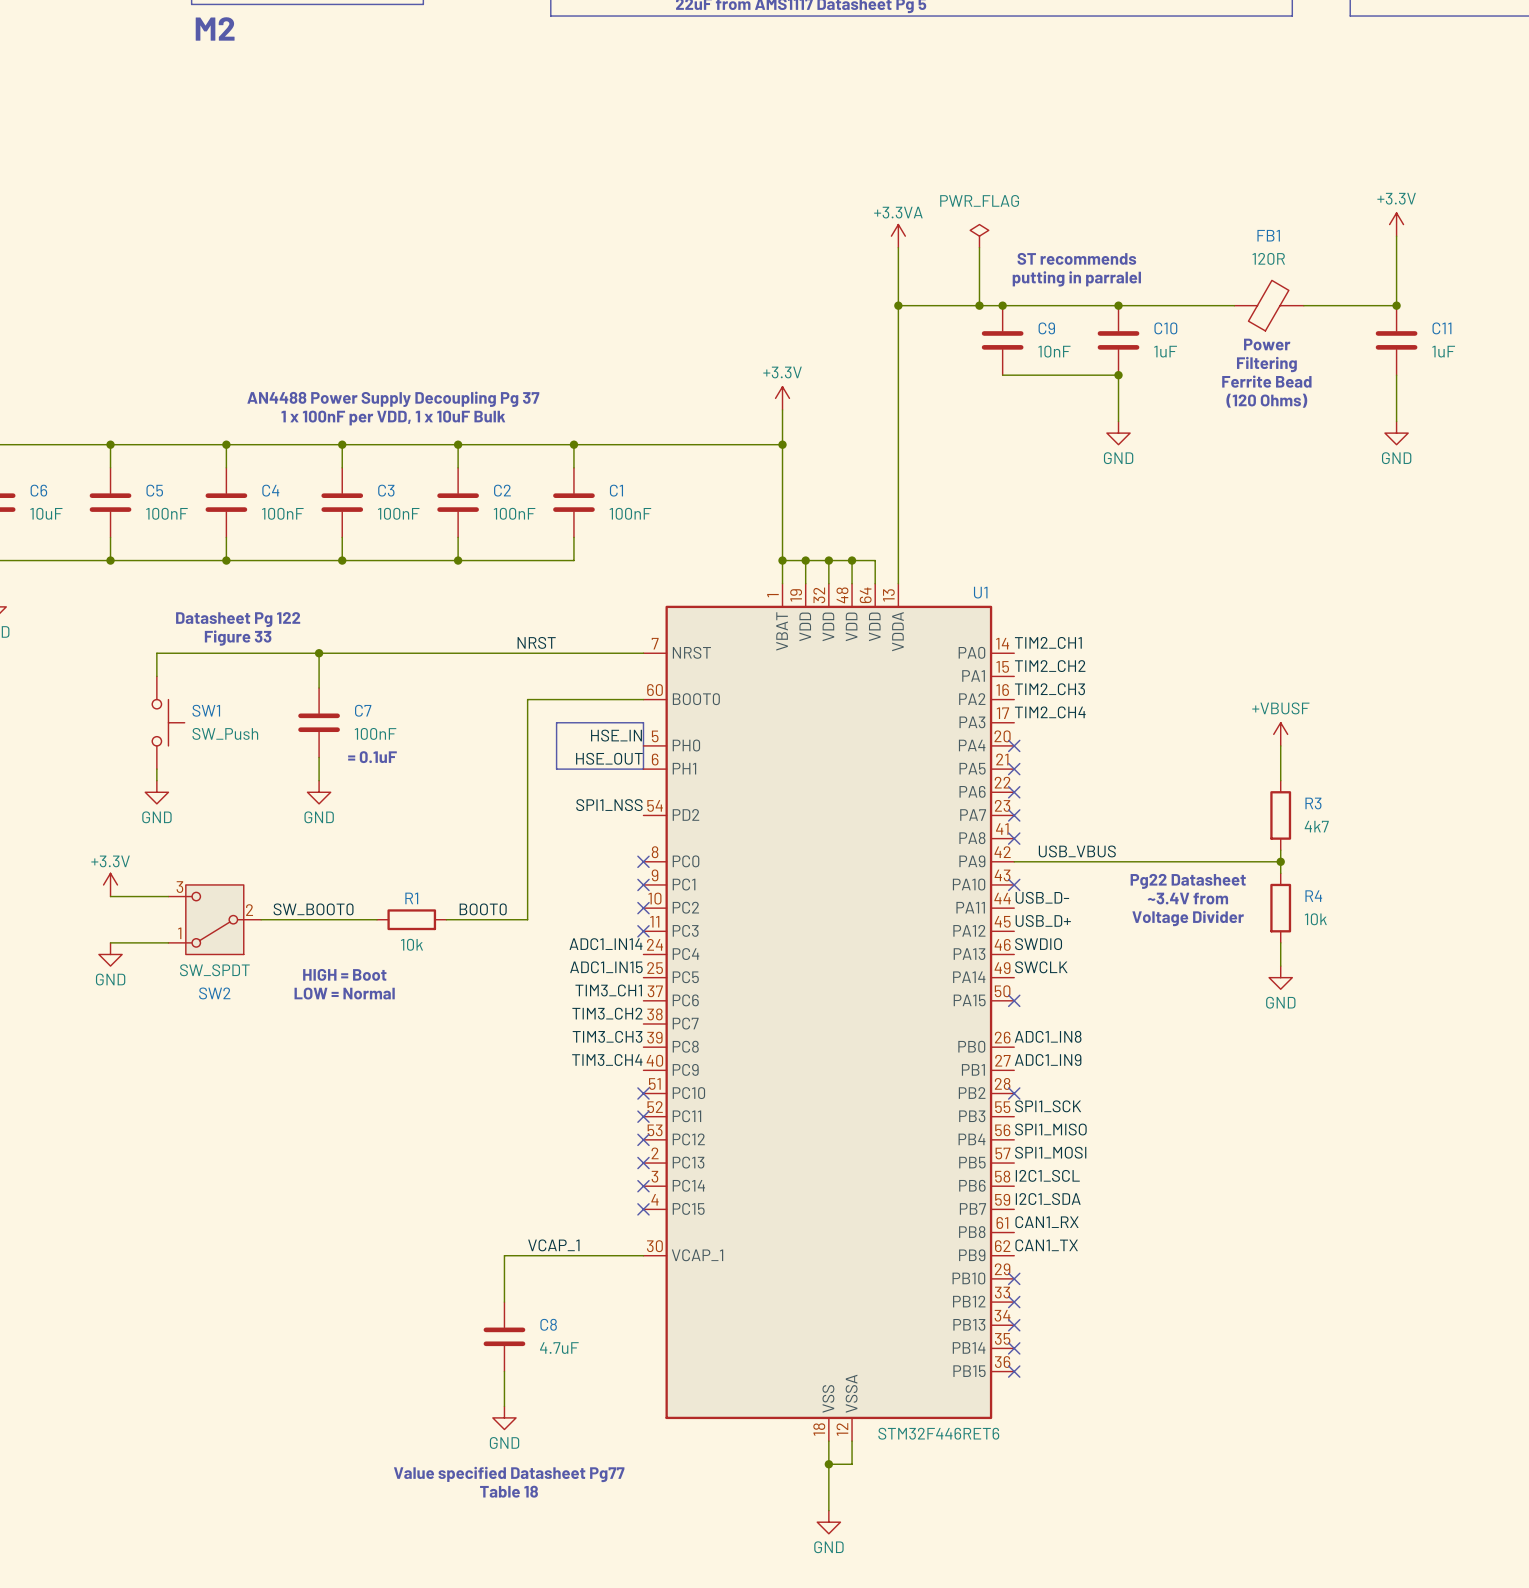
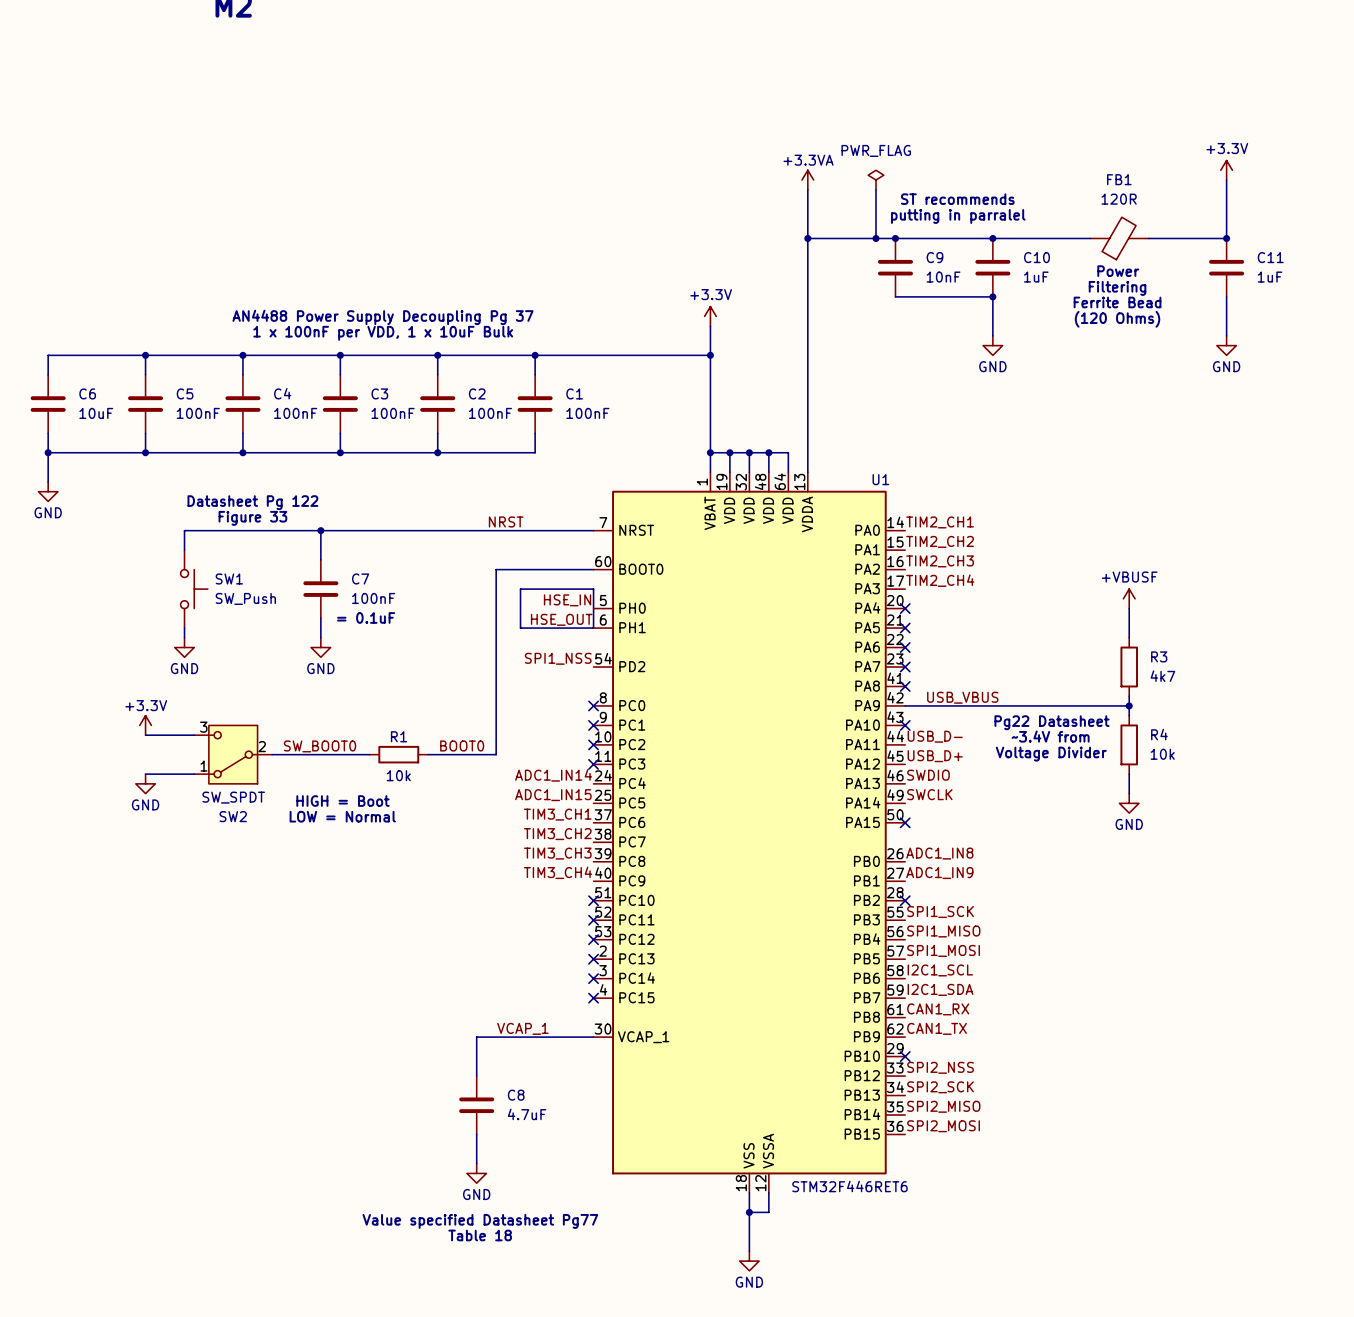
label: none -> SPI2_NSS (940, 1067)
no-connect mark: (1014, 1302) -> none
label: none -> SPI2_SCK (940, 1087)
no-connect mark: (1014, 1325) -> none
label: none -> SPI2_MISO (943, 1106)
no-connect mark: (1014, 1348) -> none
label: none -> SPI2_MOSI (943, 1126)
no-connect mark: (1014, 1371) -> none

